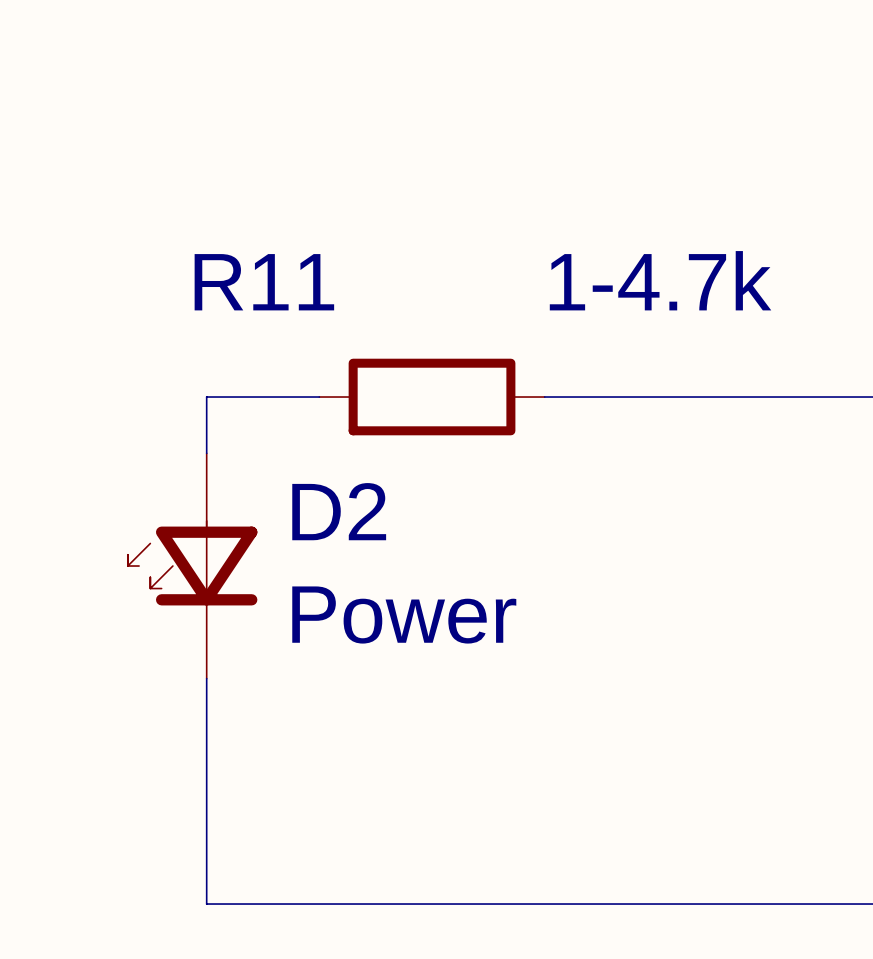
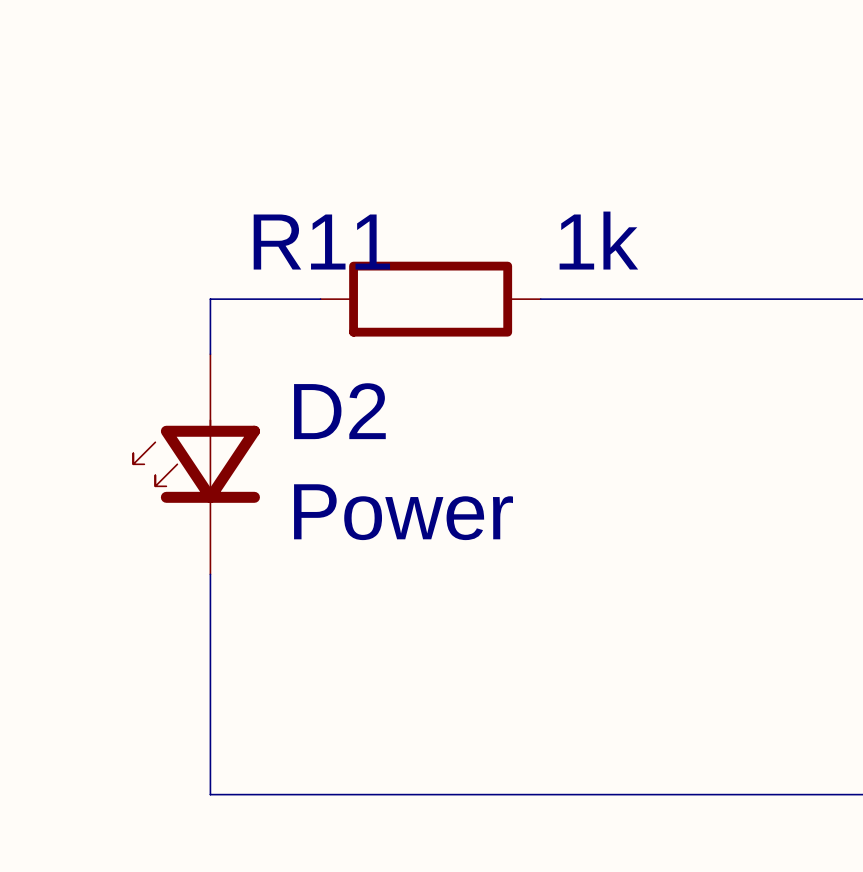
R11 value: 1-4.7k (660, 280) -> 1k (598, 240)
R11 name position: R11 (264, 282) -> R11 (321, 242)

